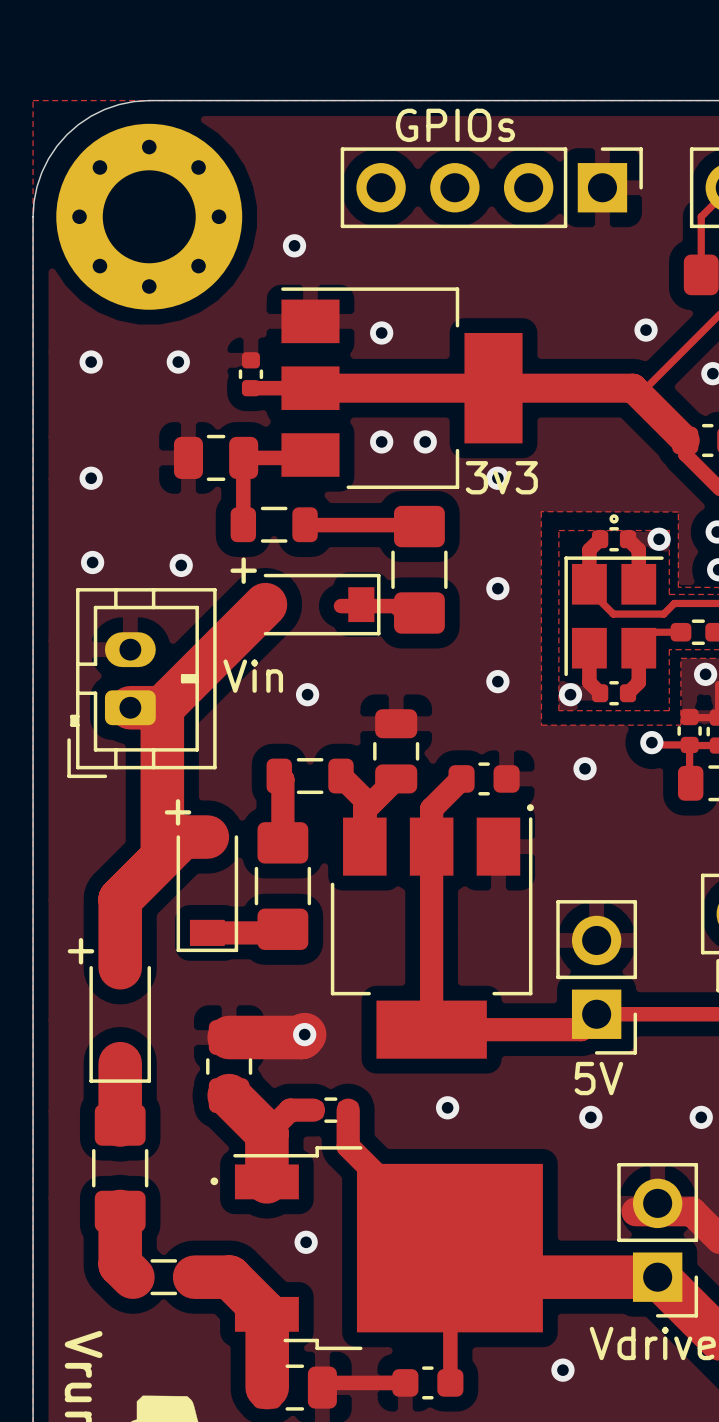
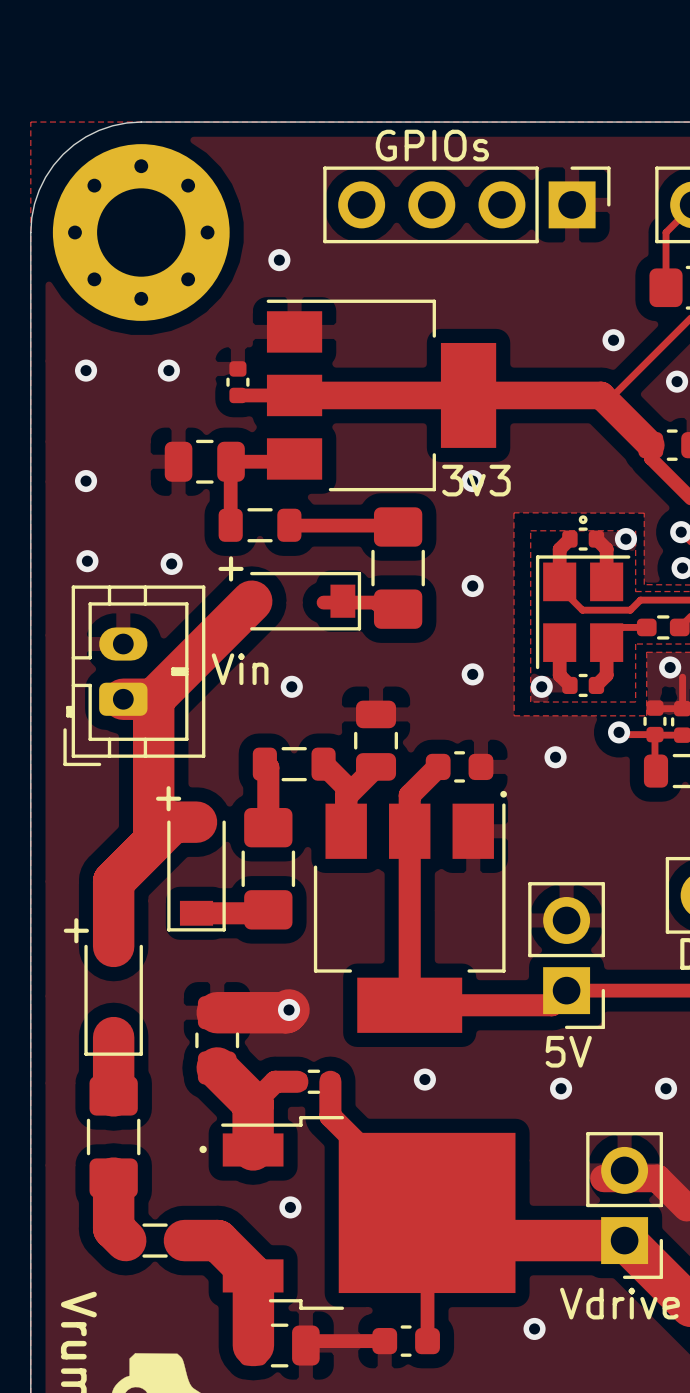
via: (381, 332) -> none
via: (381, 441) -> none
via: (425, 441) -> none

